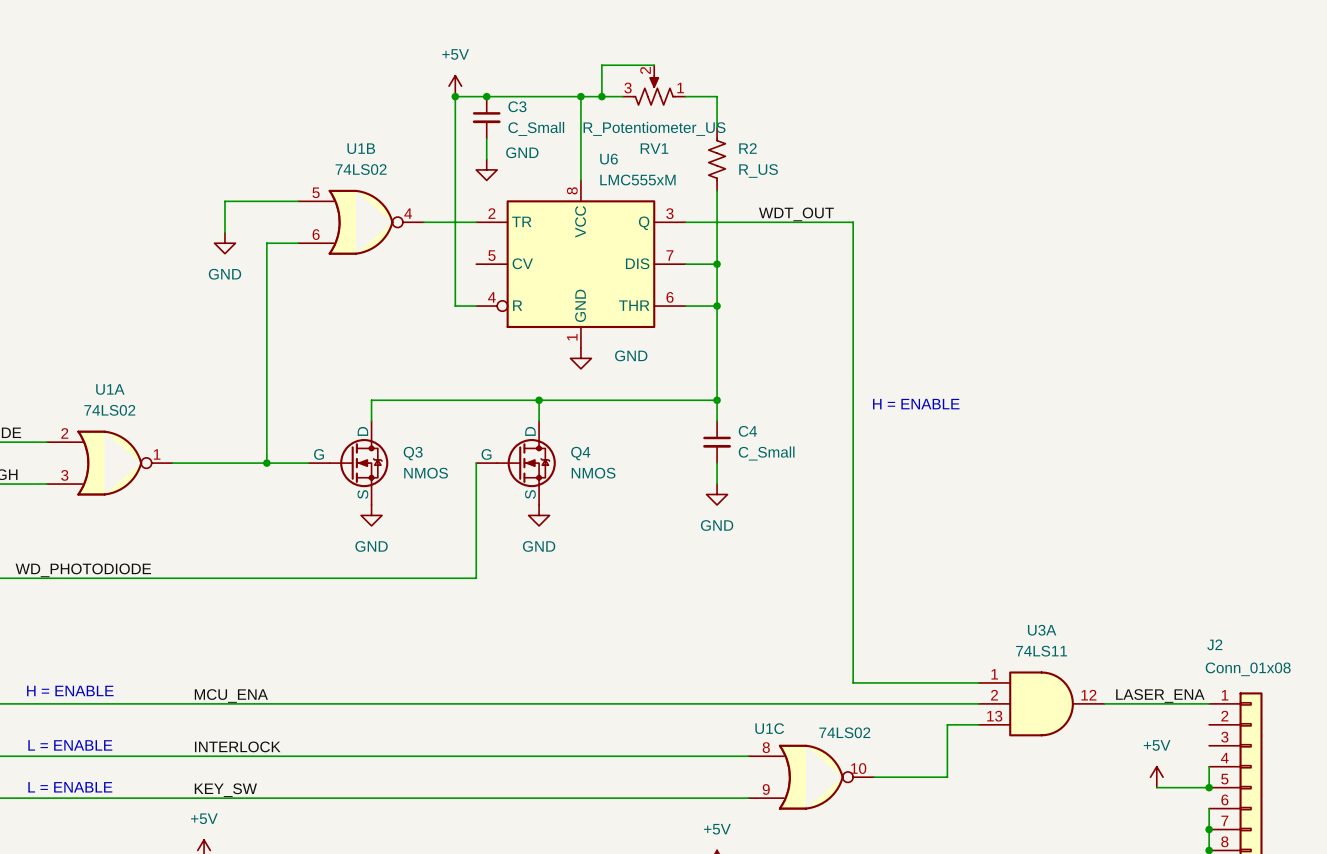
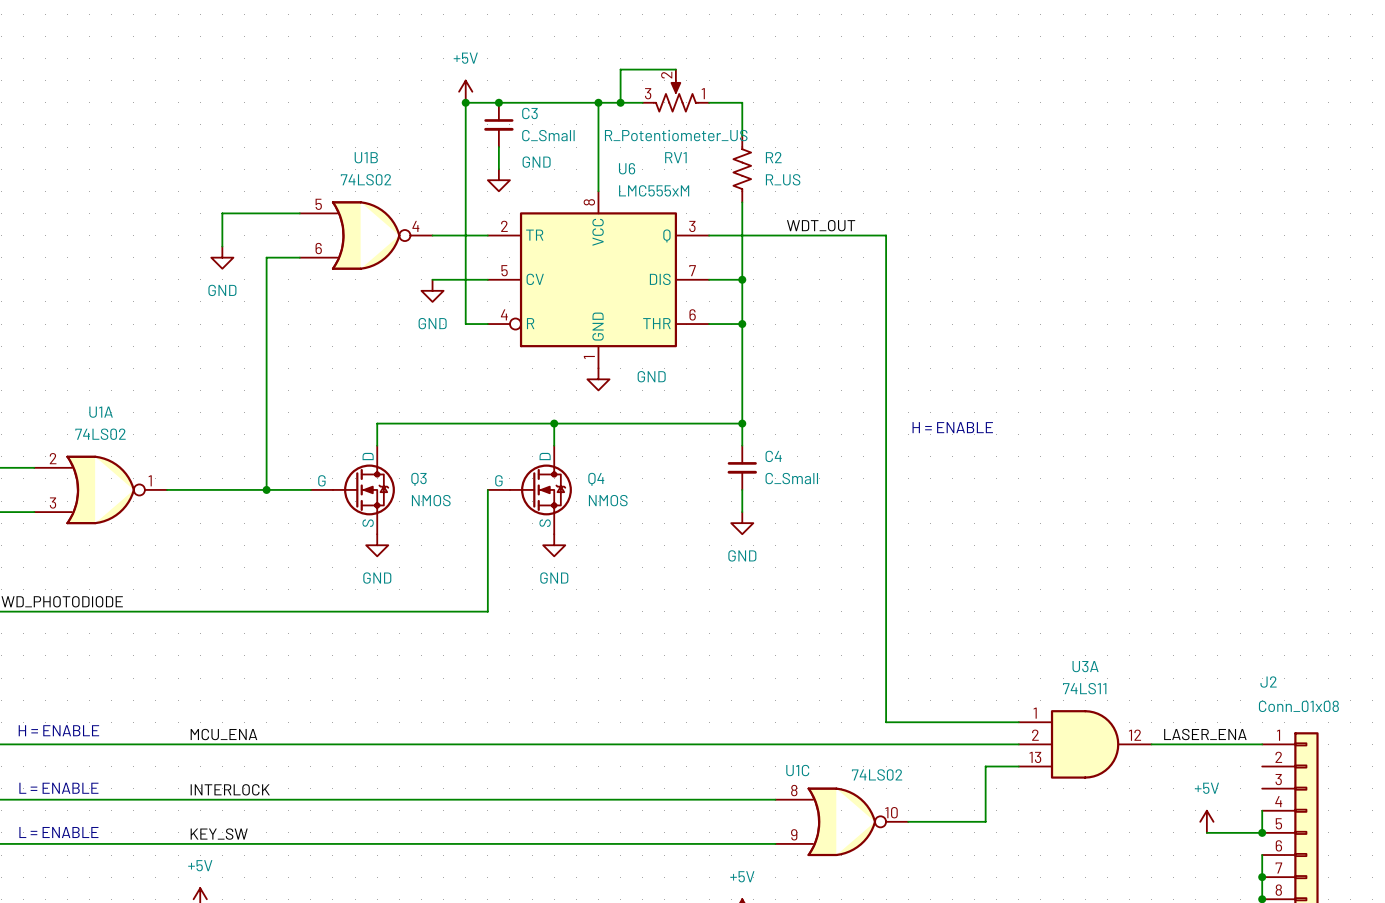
wire: none -> (432, 279) (487, 279)
power symbol: none -> GND (432, 290)

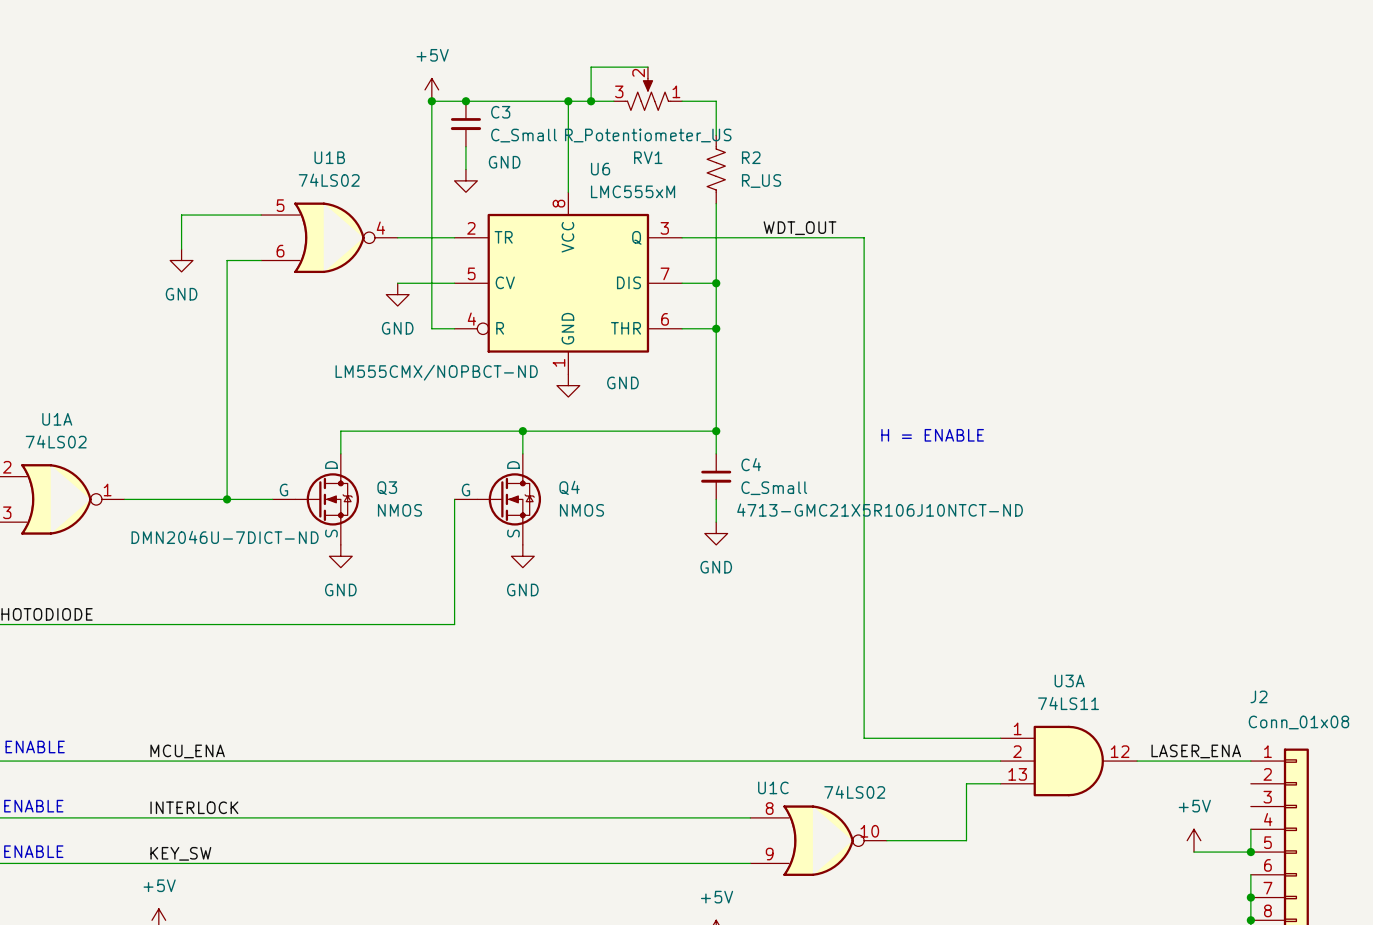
U6 text: none -> LM555CMX/NOPBCT-ND (436, 372)
C4 text: none -> 4713-GMC21X5R106J10NTCT-ND (880, 510)
Q3 text: none -> DMN2046U-7DICT-ND (225, 537)

